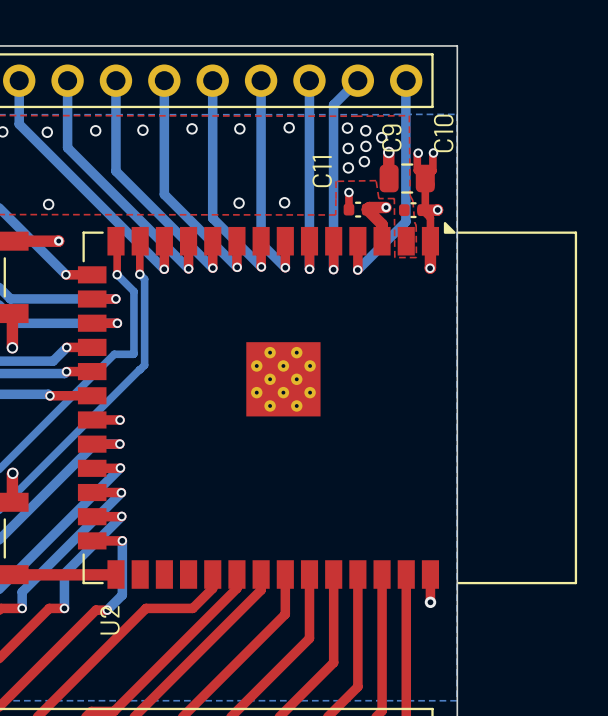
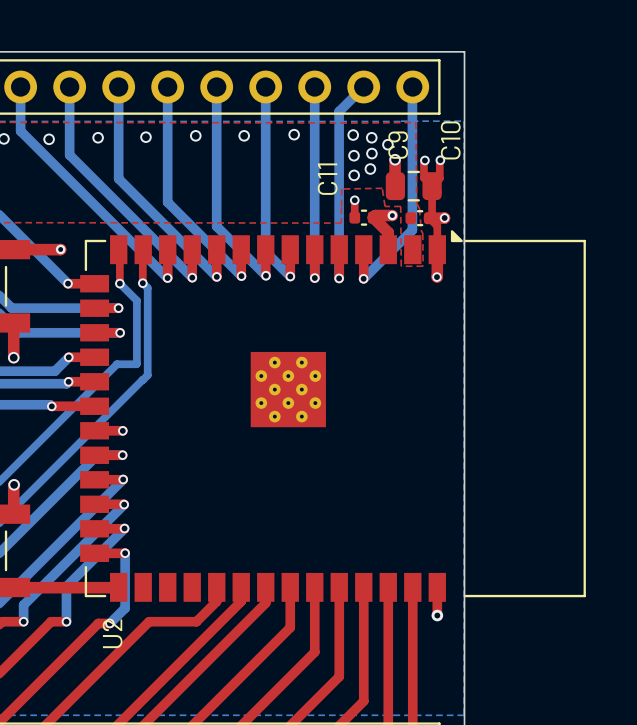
via: (284, 202) -> none
via: (239, 203) -> none
via: (48, 204) -> none

